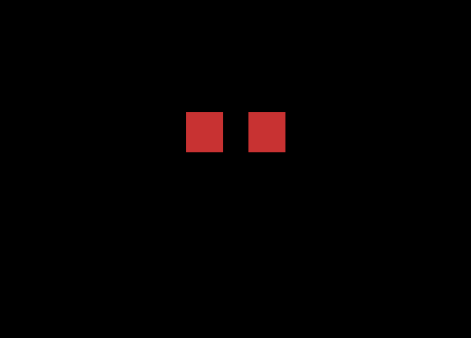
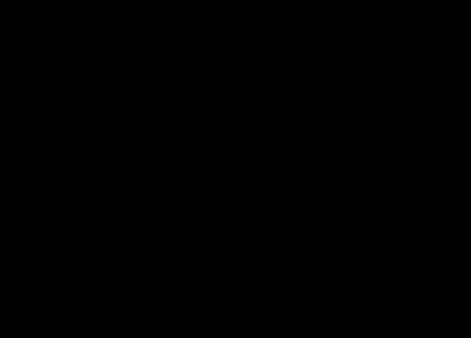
part: (235, 132) -> none

